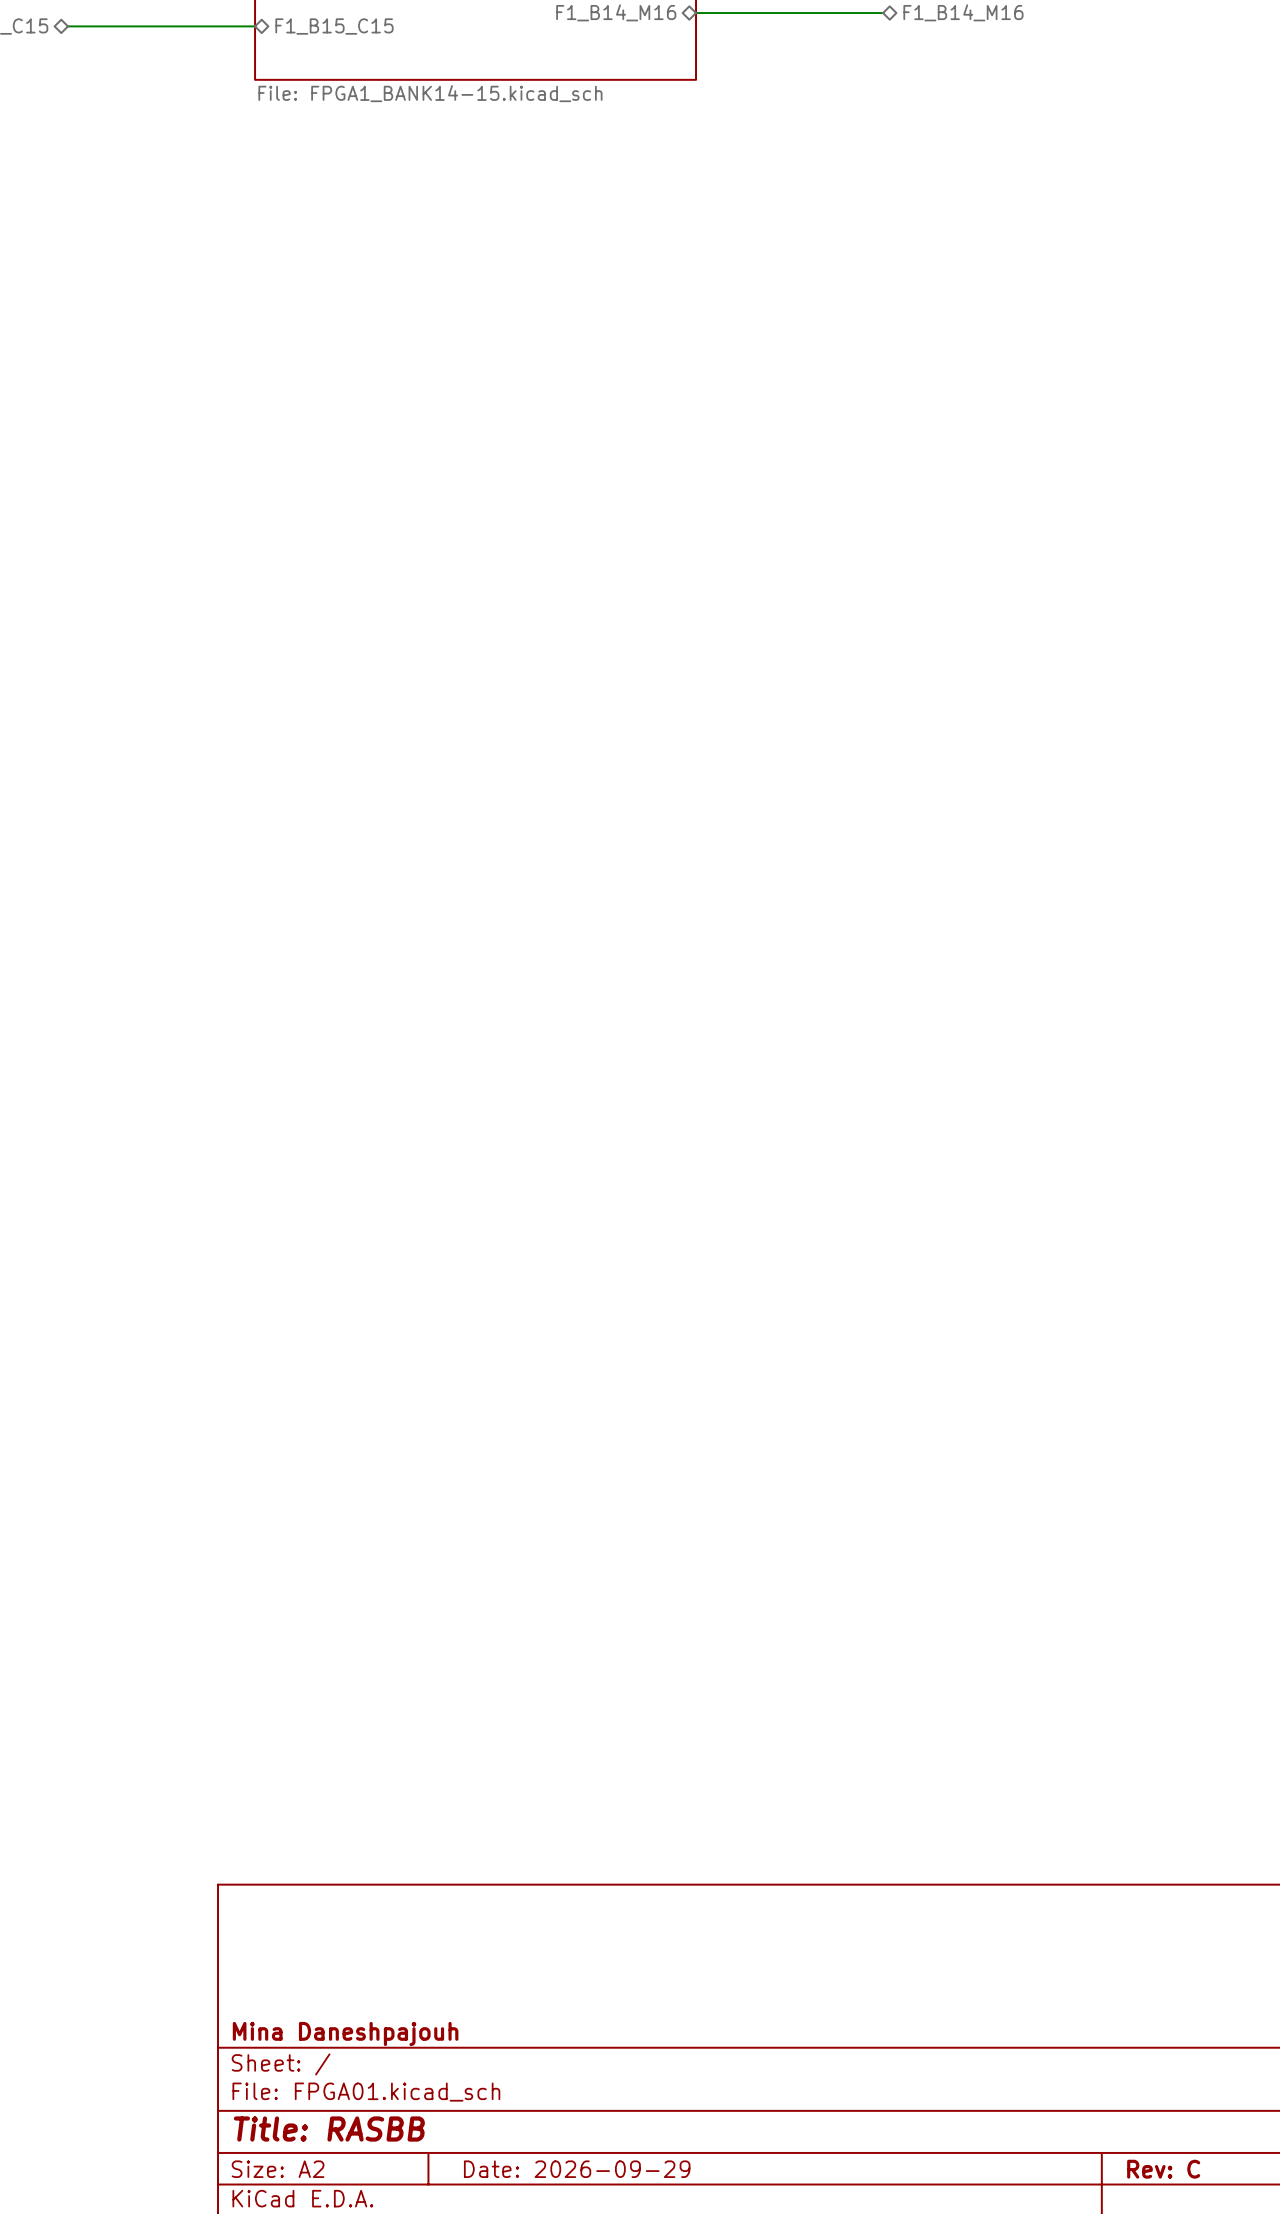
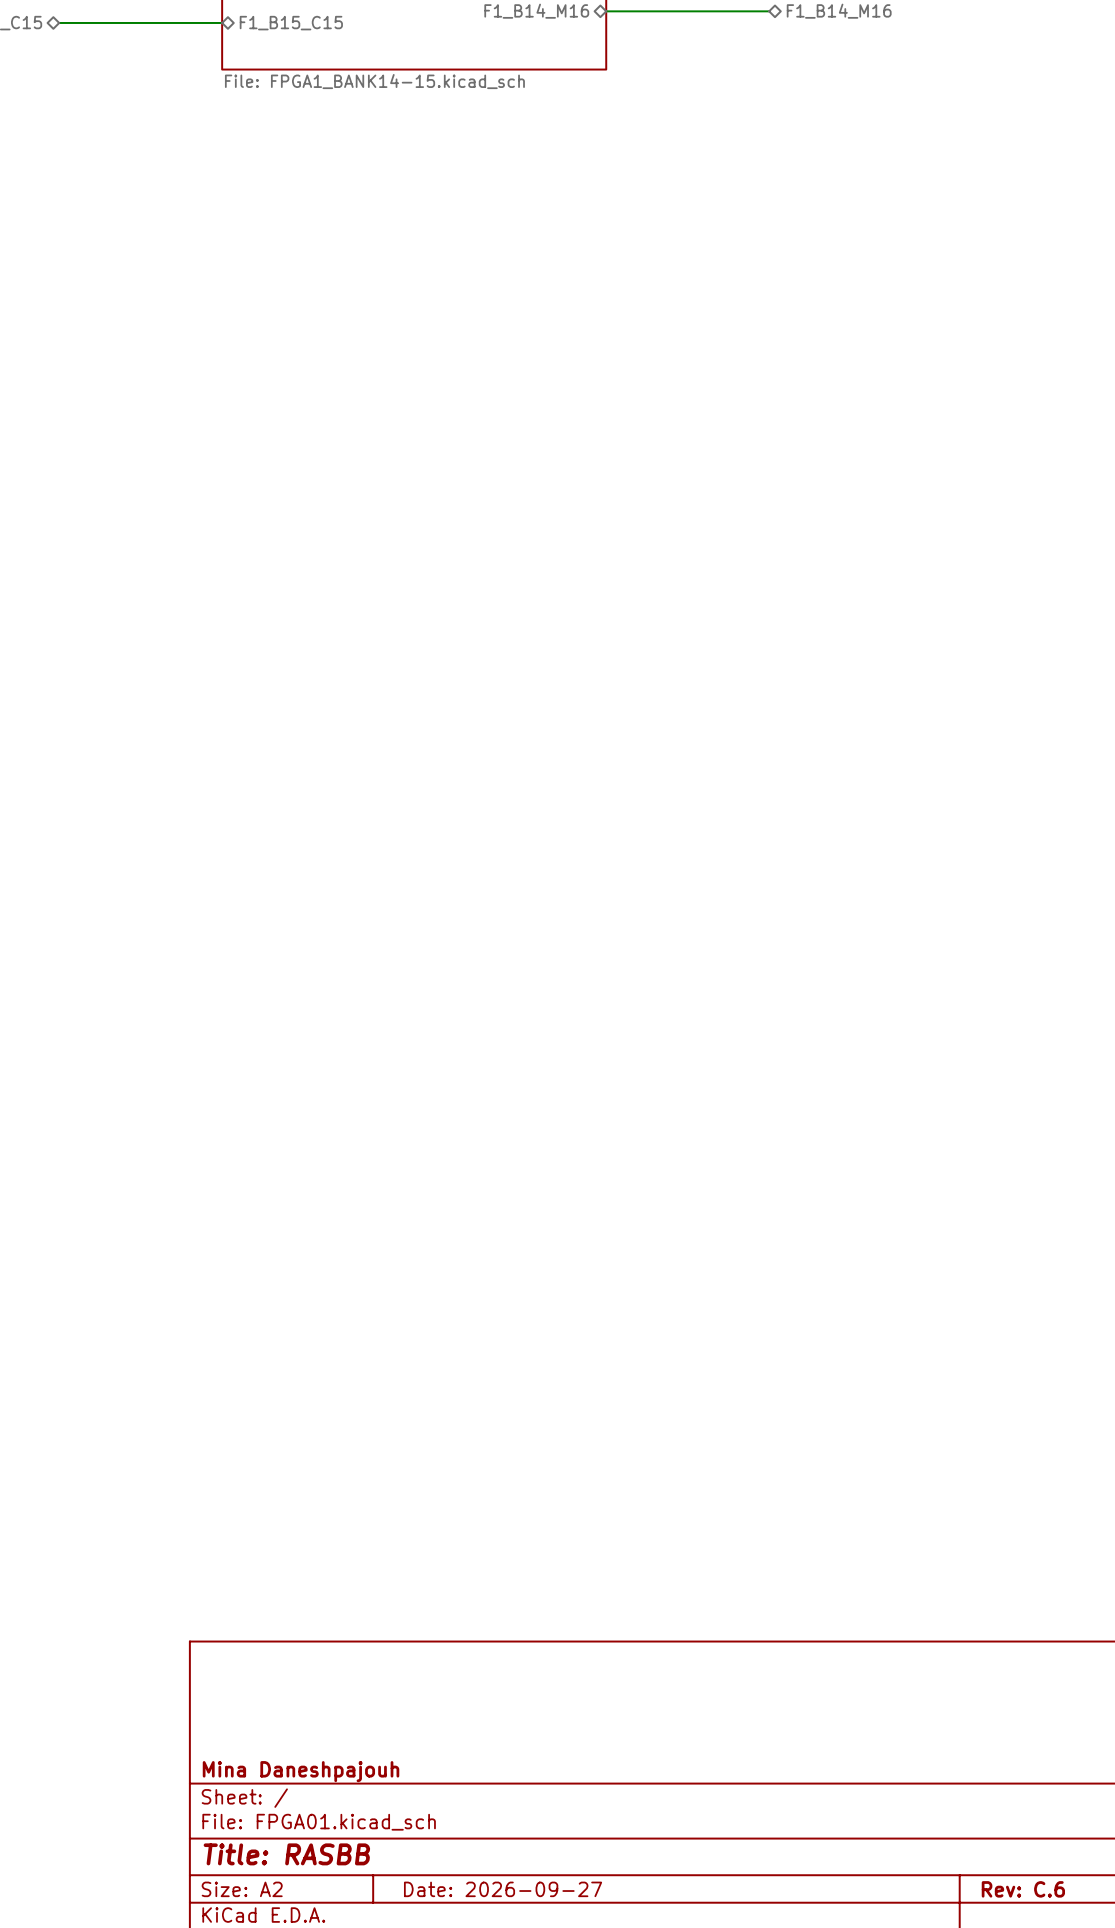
title block: Date: 2026-09-29 (577, 2169) -> Date: 2026-09-27 (503, 1889)
title block: Rev: C (1163, 2169) -> Rev: C.6 (1023, 1889)

